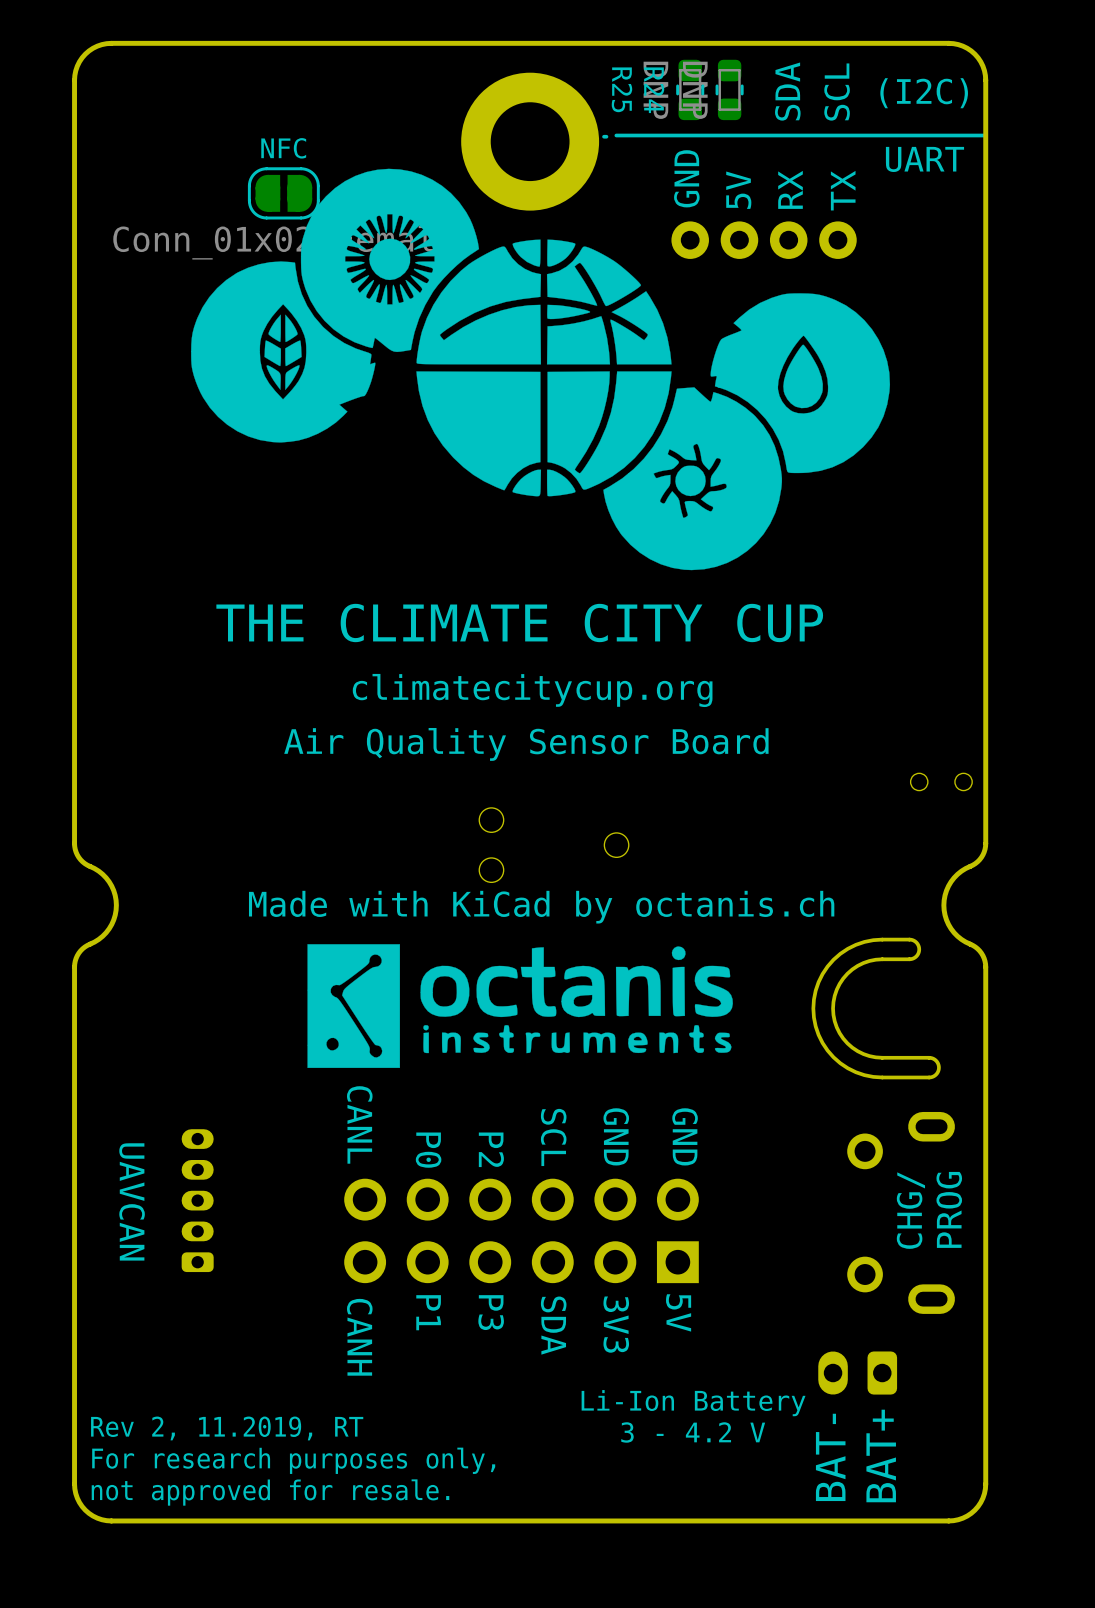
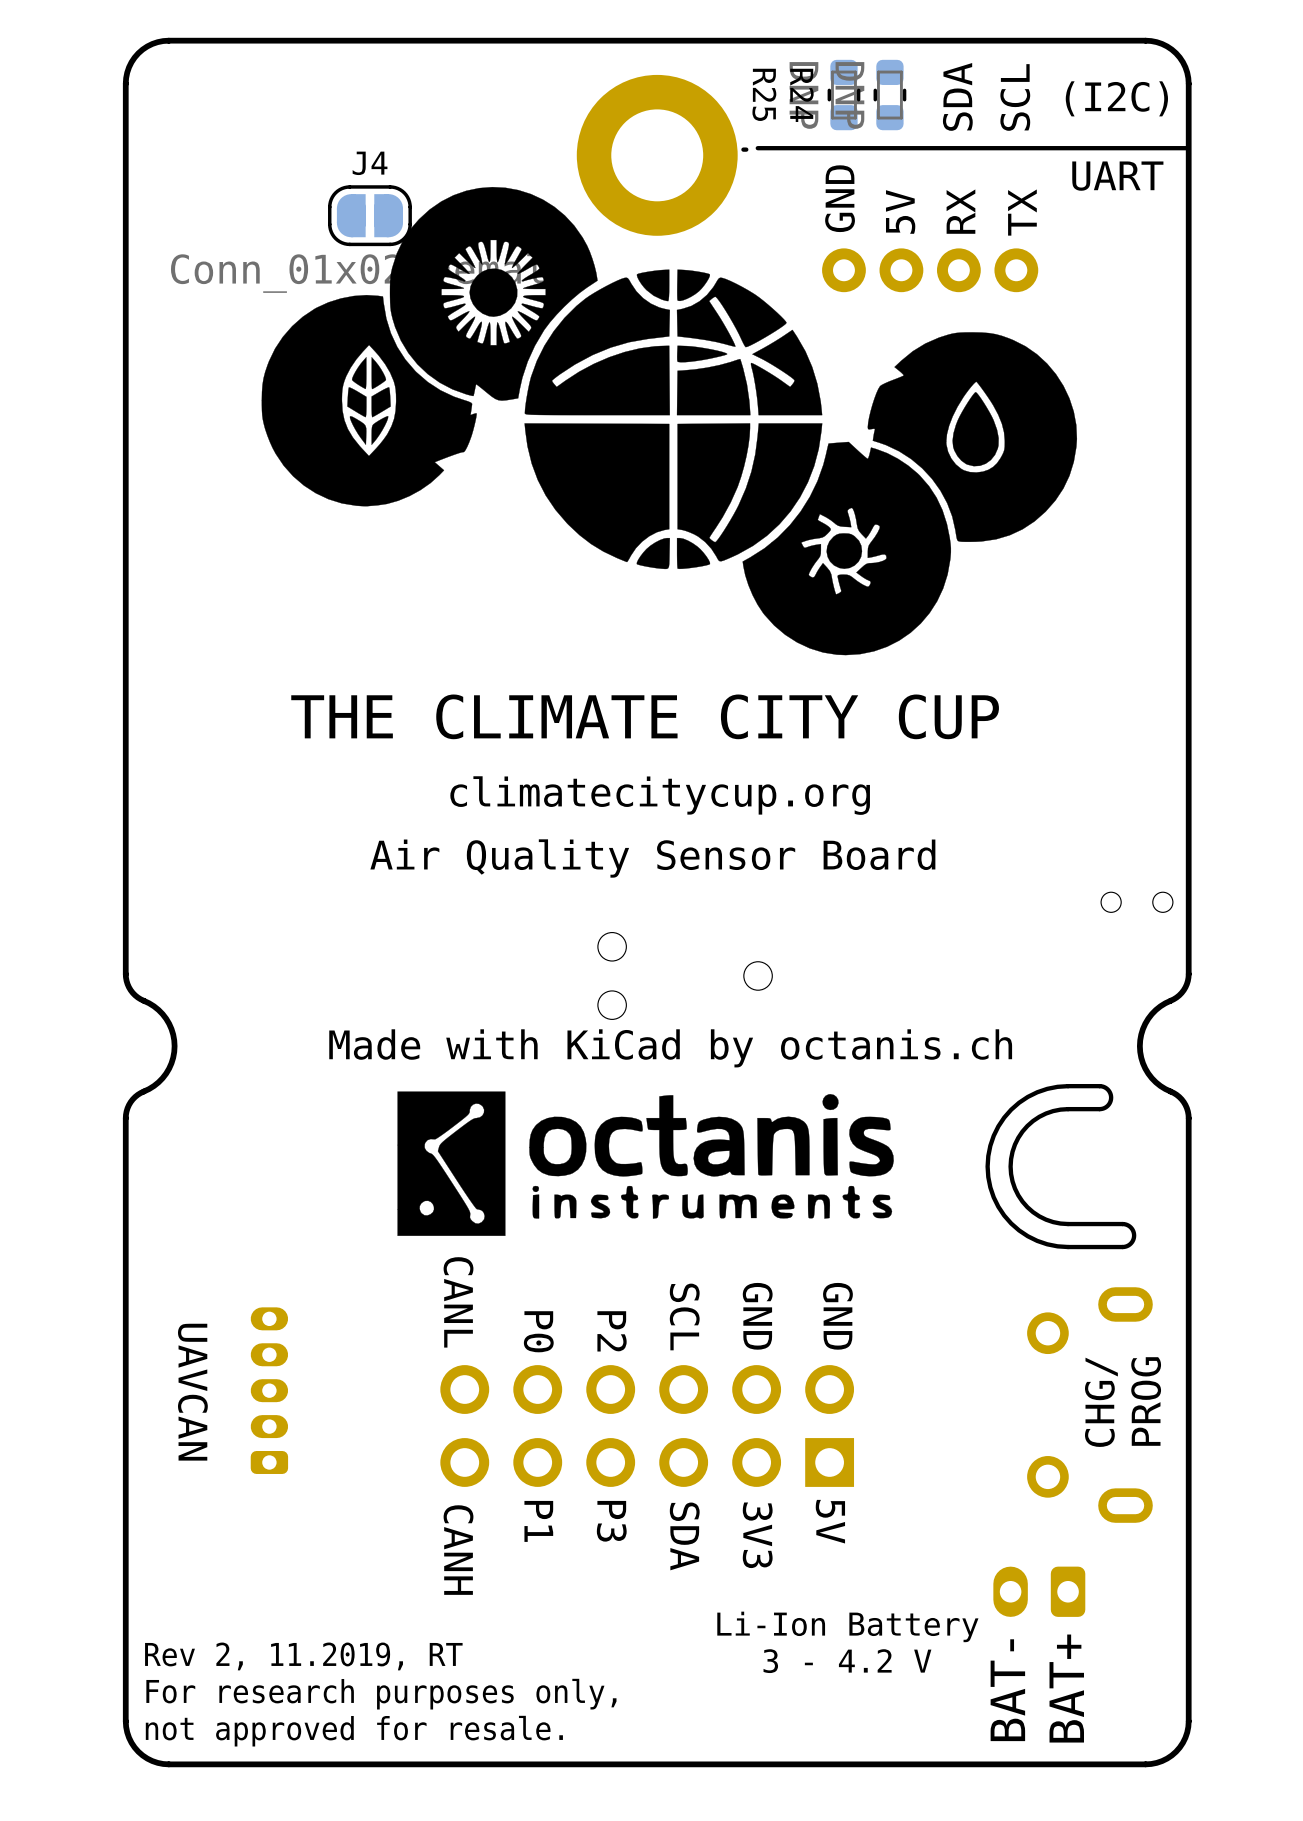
NFC name: NFC (283, 148) -> J4 (370, 163)

